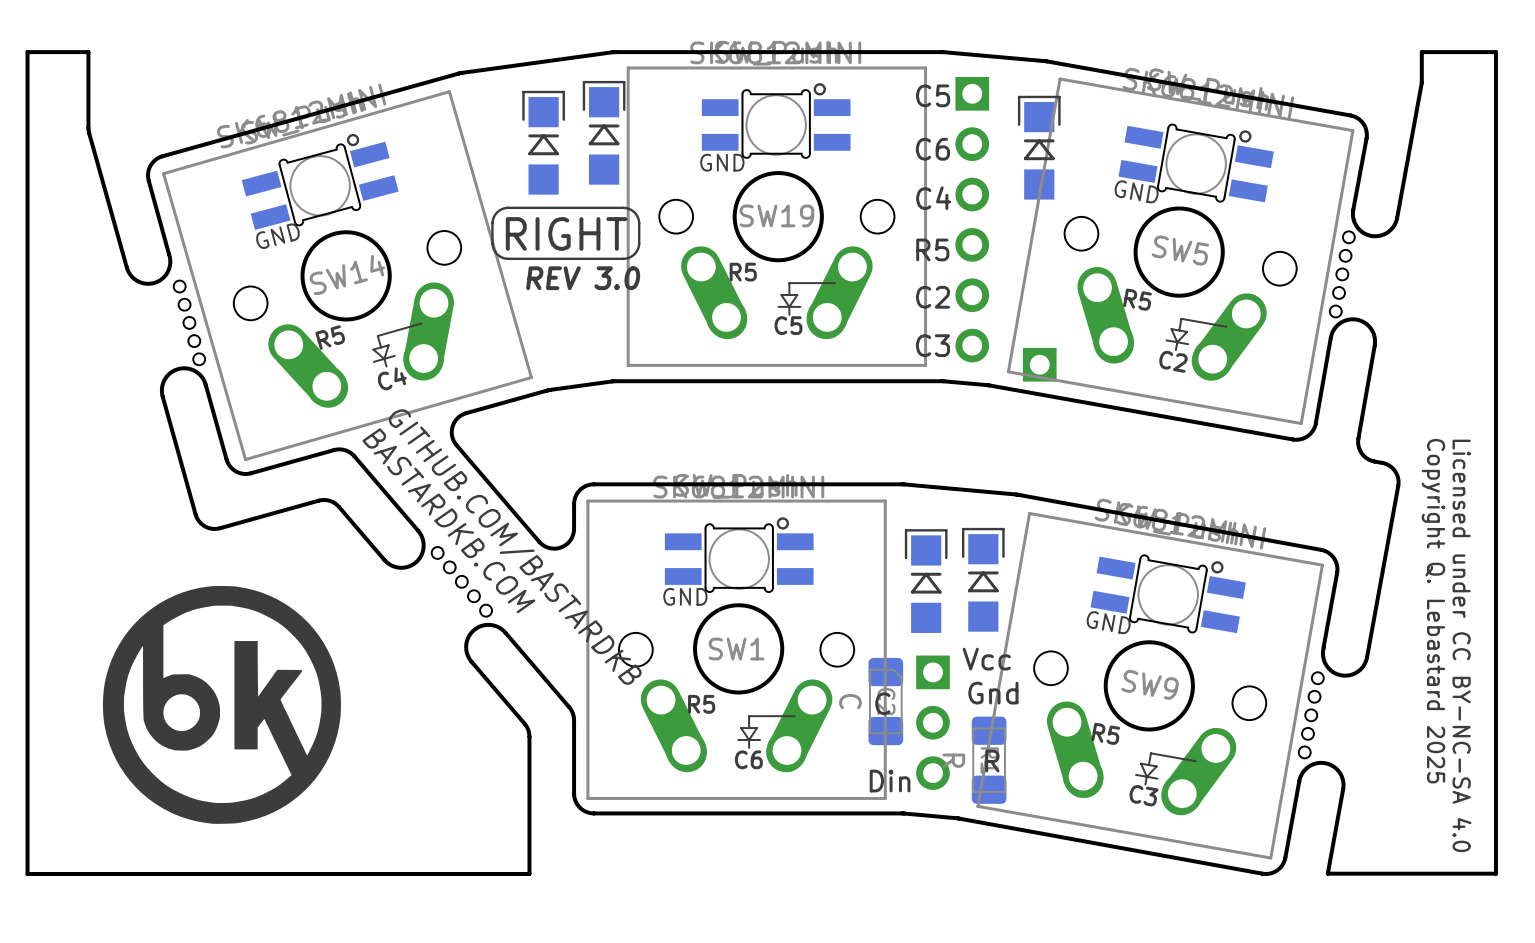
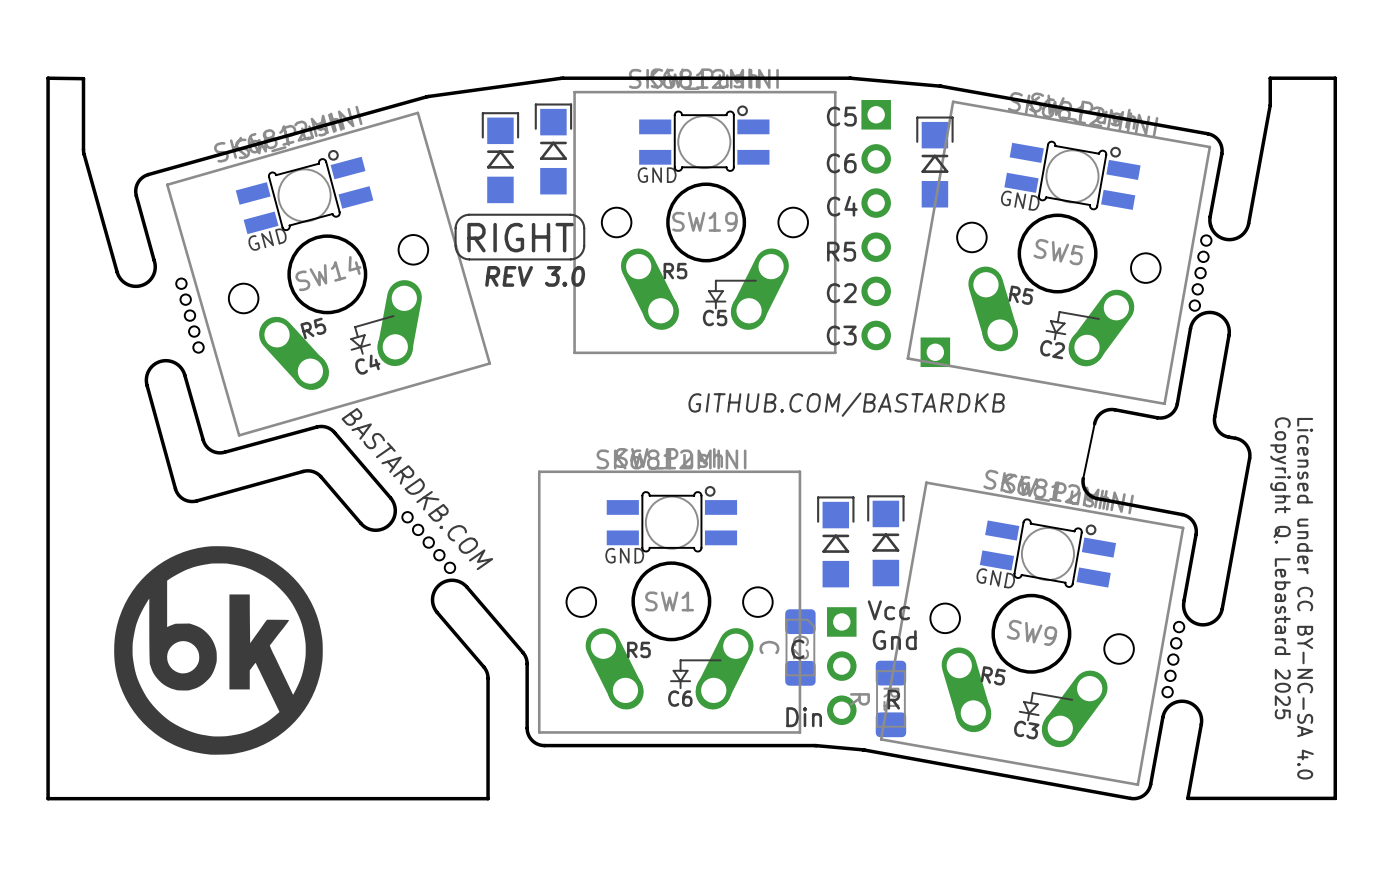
board edge: (27, 52) (88, 52) (88, 131) (127, 270) (134, 278) (144, 283) (152, 283) (160, 280) (167, 272) (170, 264) (169, 256) (148, 175) (151, 163) (162, 156) -> (48, 78) (83, 78) (83, 153) (117, 274) (123, 282) (130, 285) (139, 286) (146, 283) (152, 276) (155, 267) (136, 195) (136, 186) (144, 176) (166, 169)
board edge: (162, 396) (195, 514) (203, 525) (217, 528) (318, 500) -> (316, 427) (224, 452) (215, 452) (208, 448) (203, 442) (181, 368) (173, 362) (163, 360) (153, 364) (146, 375) (147, 385) (175, 488) (183, 499) (196, 500) (303, 471)
board edge: (162, 396) (163, 382) (172, 371) (186, 368) (199, 374) (205, 384) (227, 461) (232, 468) (240, 473) (251, 473) (333, 450) -> none
board edge: (1292, 439) (989, 385) (941, 381) (613, 381) (548, 390) (466, 413) (456, 419) (451, 431) (456, 445) (539, 541) (551, 548) (563, 546) (571, 538) (573, 531) (575, 497) (581, 488) (589, 484) (902, 484) (1016, 494) (1321, 549) -> (1157, 417) (1112, 409) (1100, 413) (1094, 423) (1083, 478) (1083, 486) (1088, 494) (1095, 498) (1182, 514)
text rotation: 0° (515, 547) -> 48° counterclockwise (846, 404)
text position: GITHUB.COM/BASTARDKB (515, 547) -> GITHUB.COM/BASTARDKB (846, 404)

